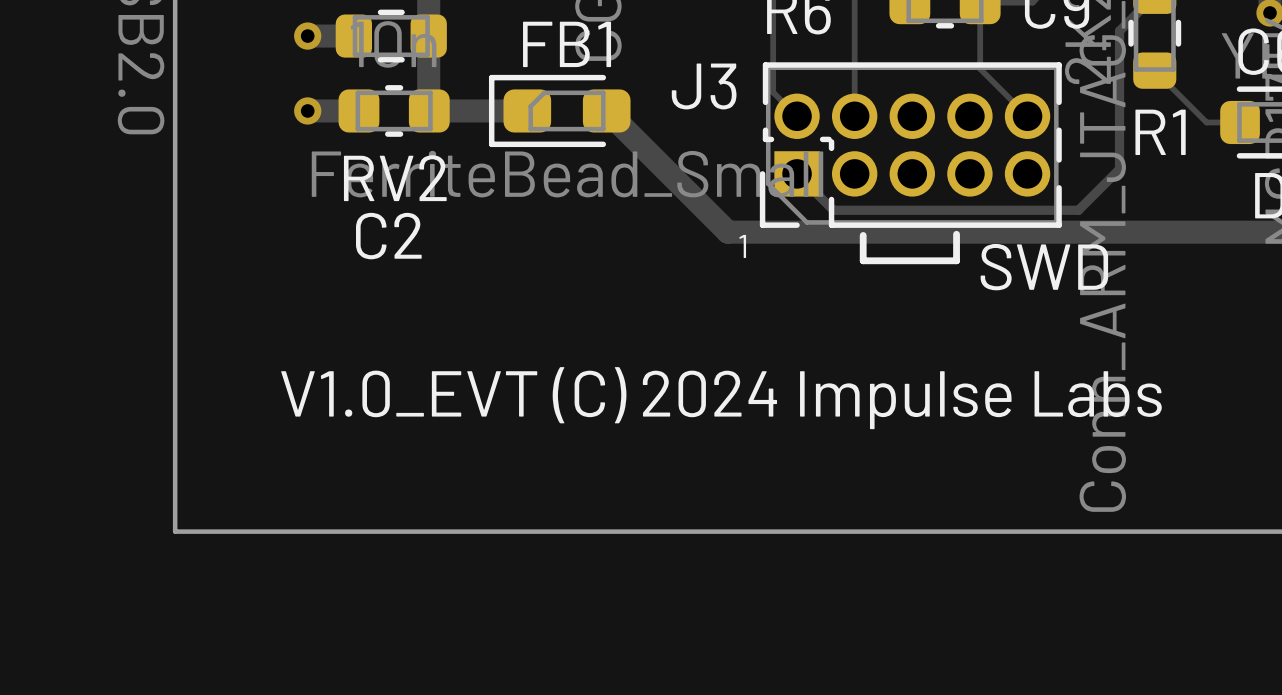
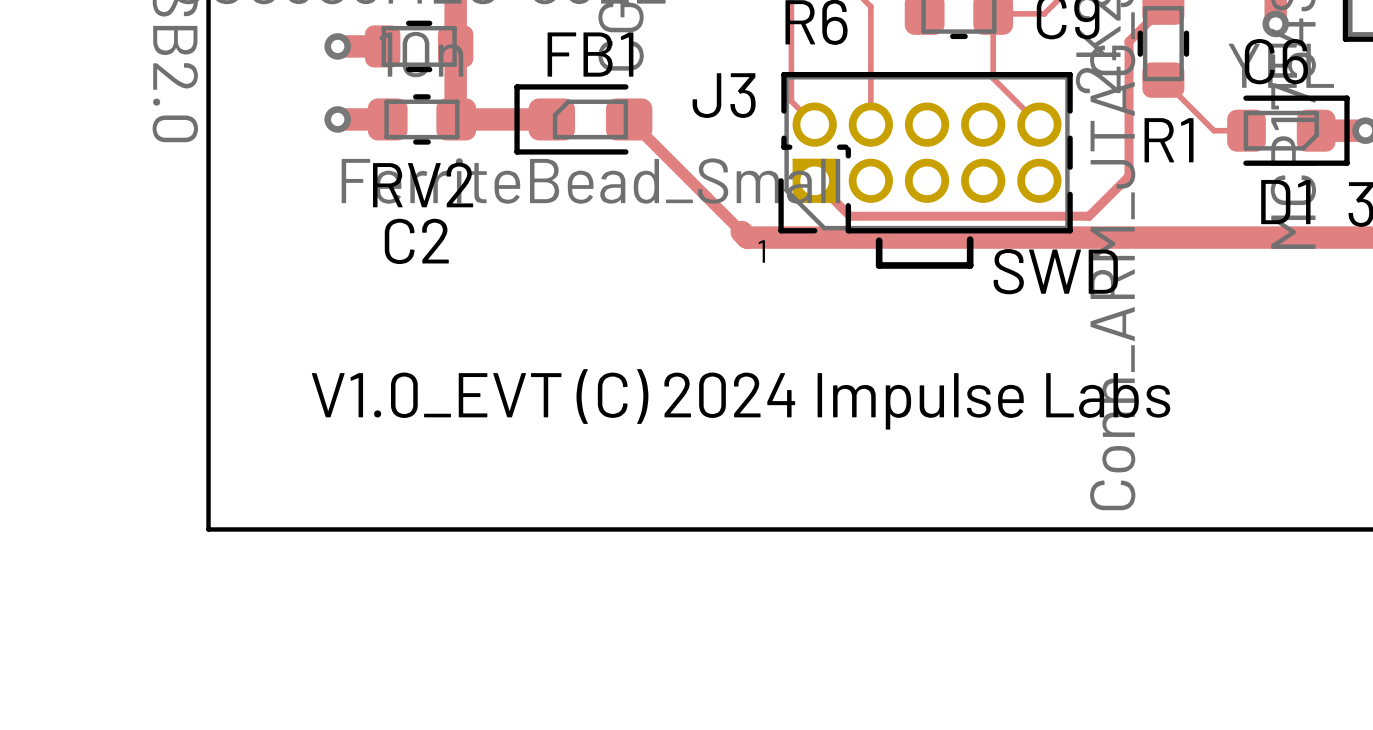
track width: thick (606, 110) (722, 226) -> thin (629, 119) (741, 231)

